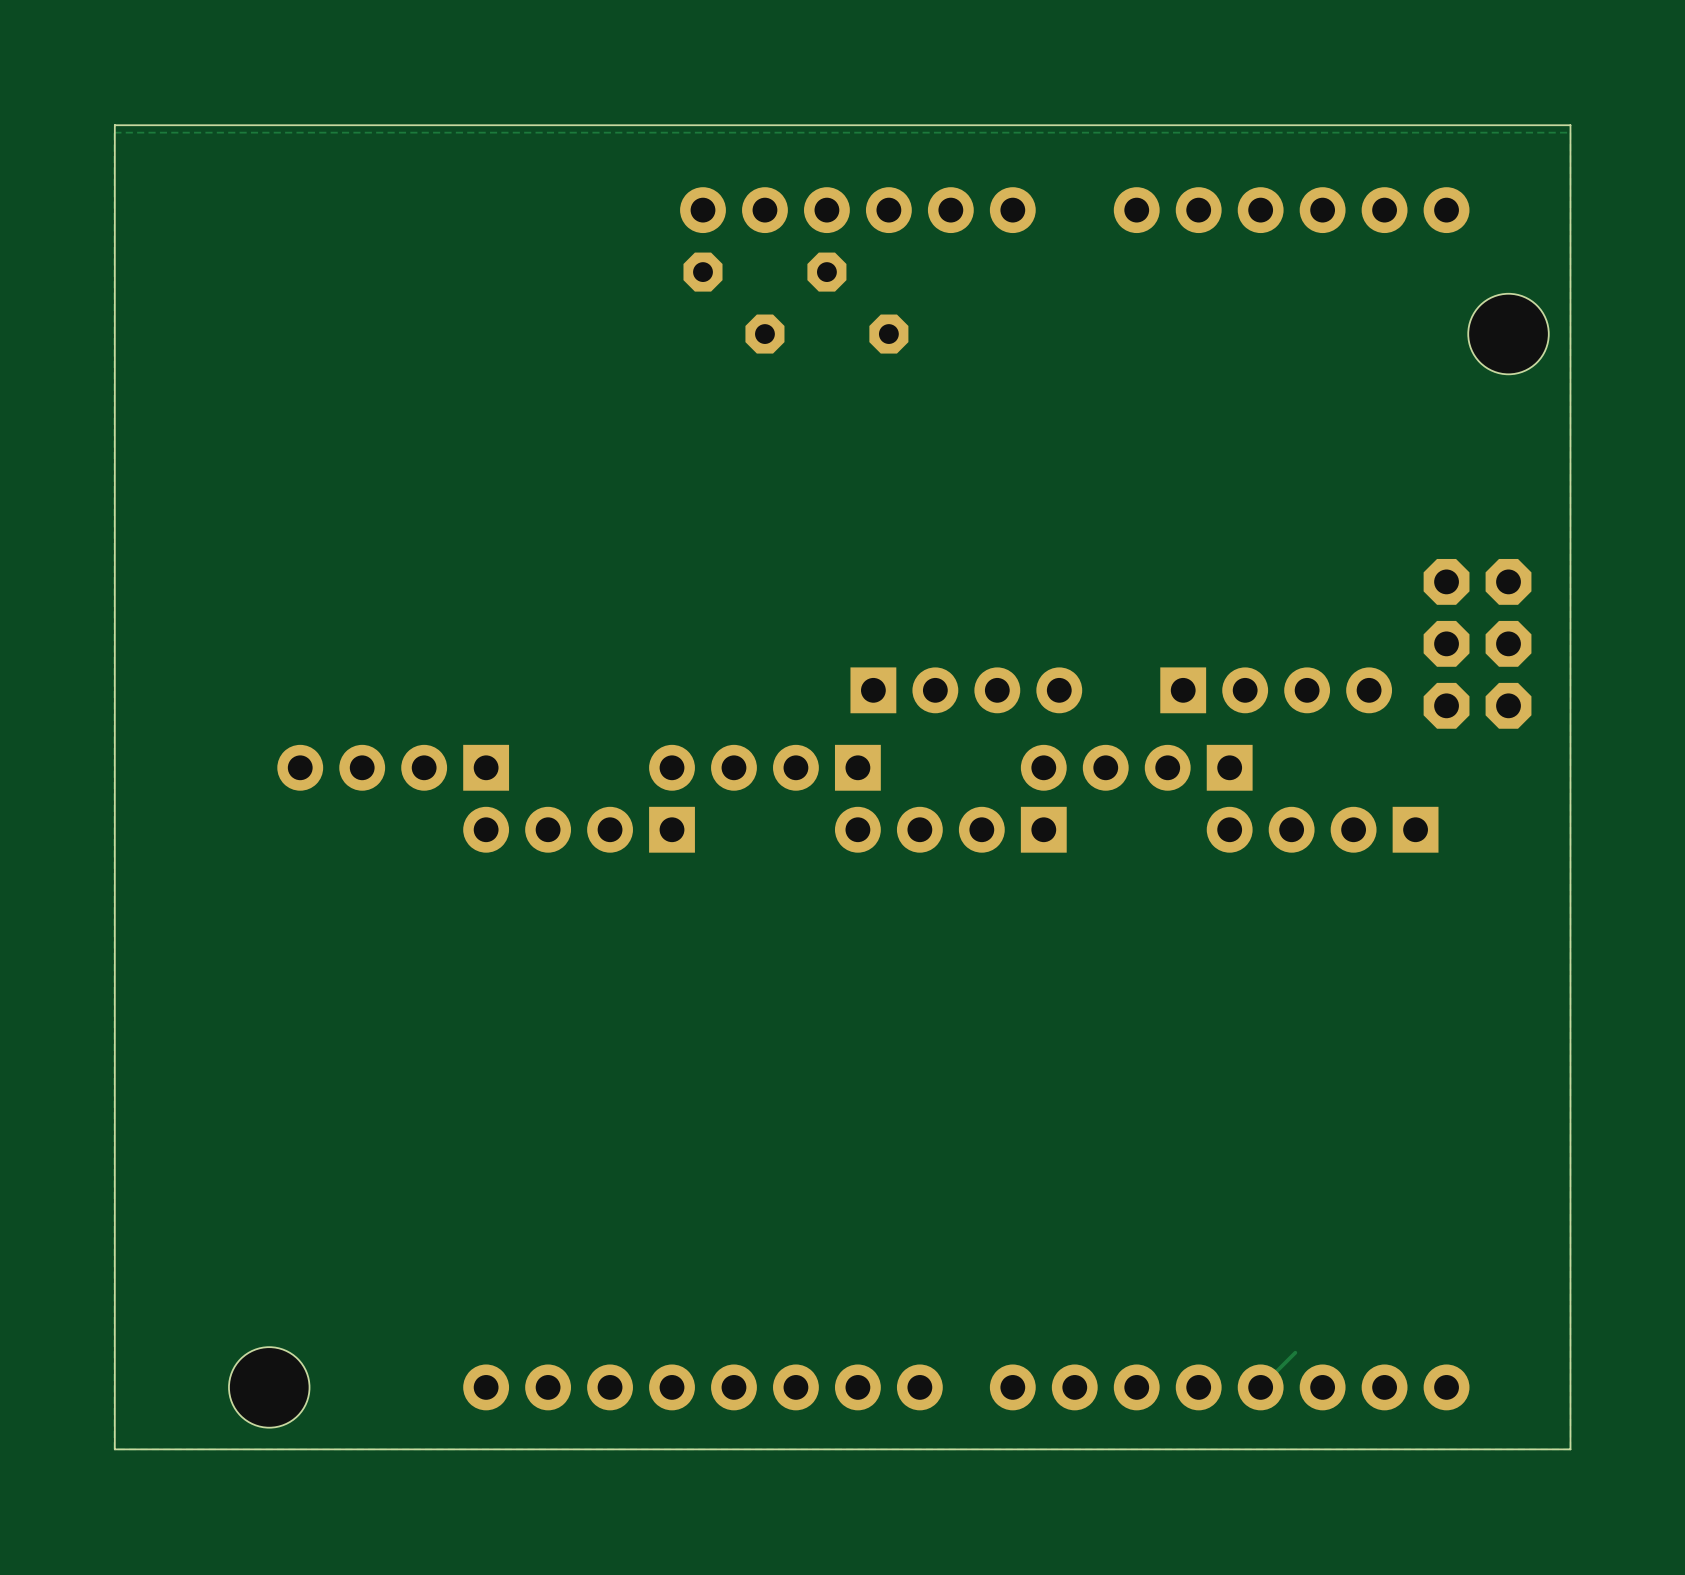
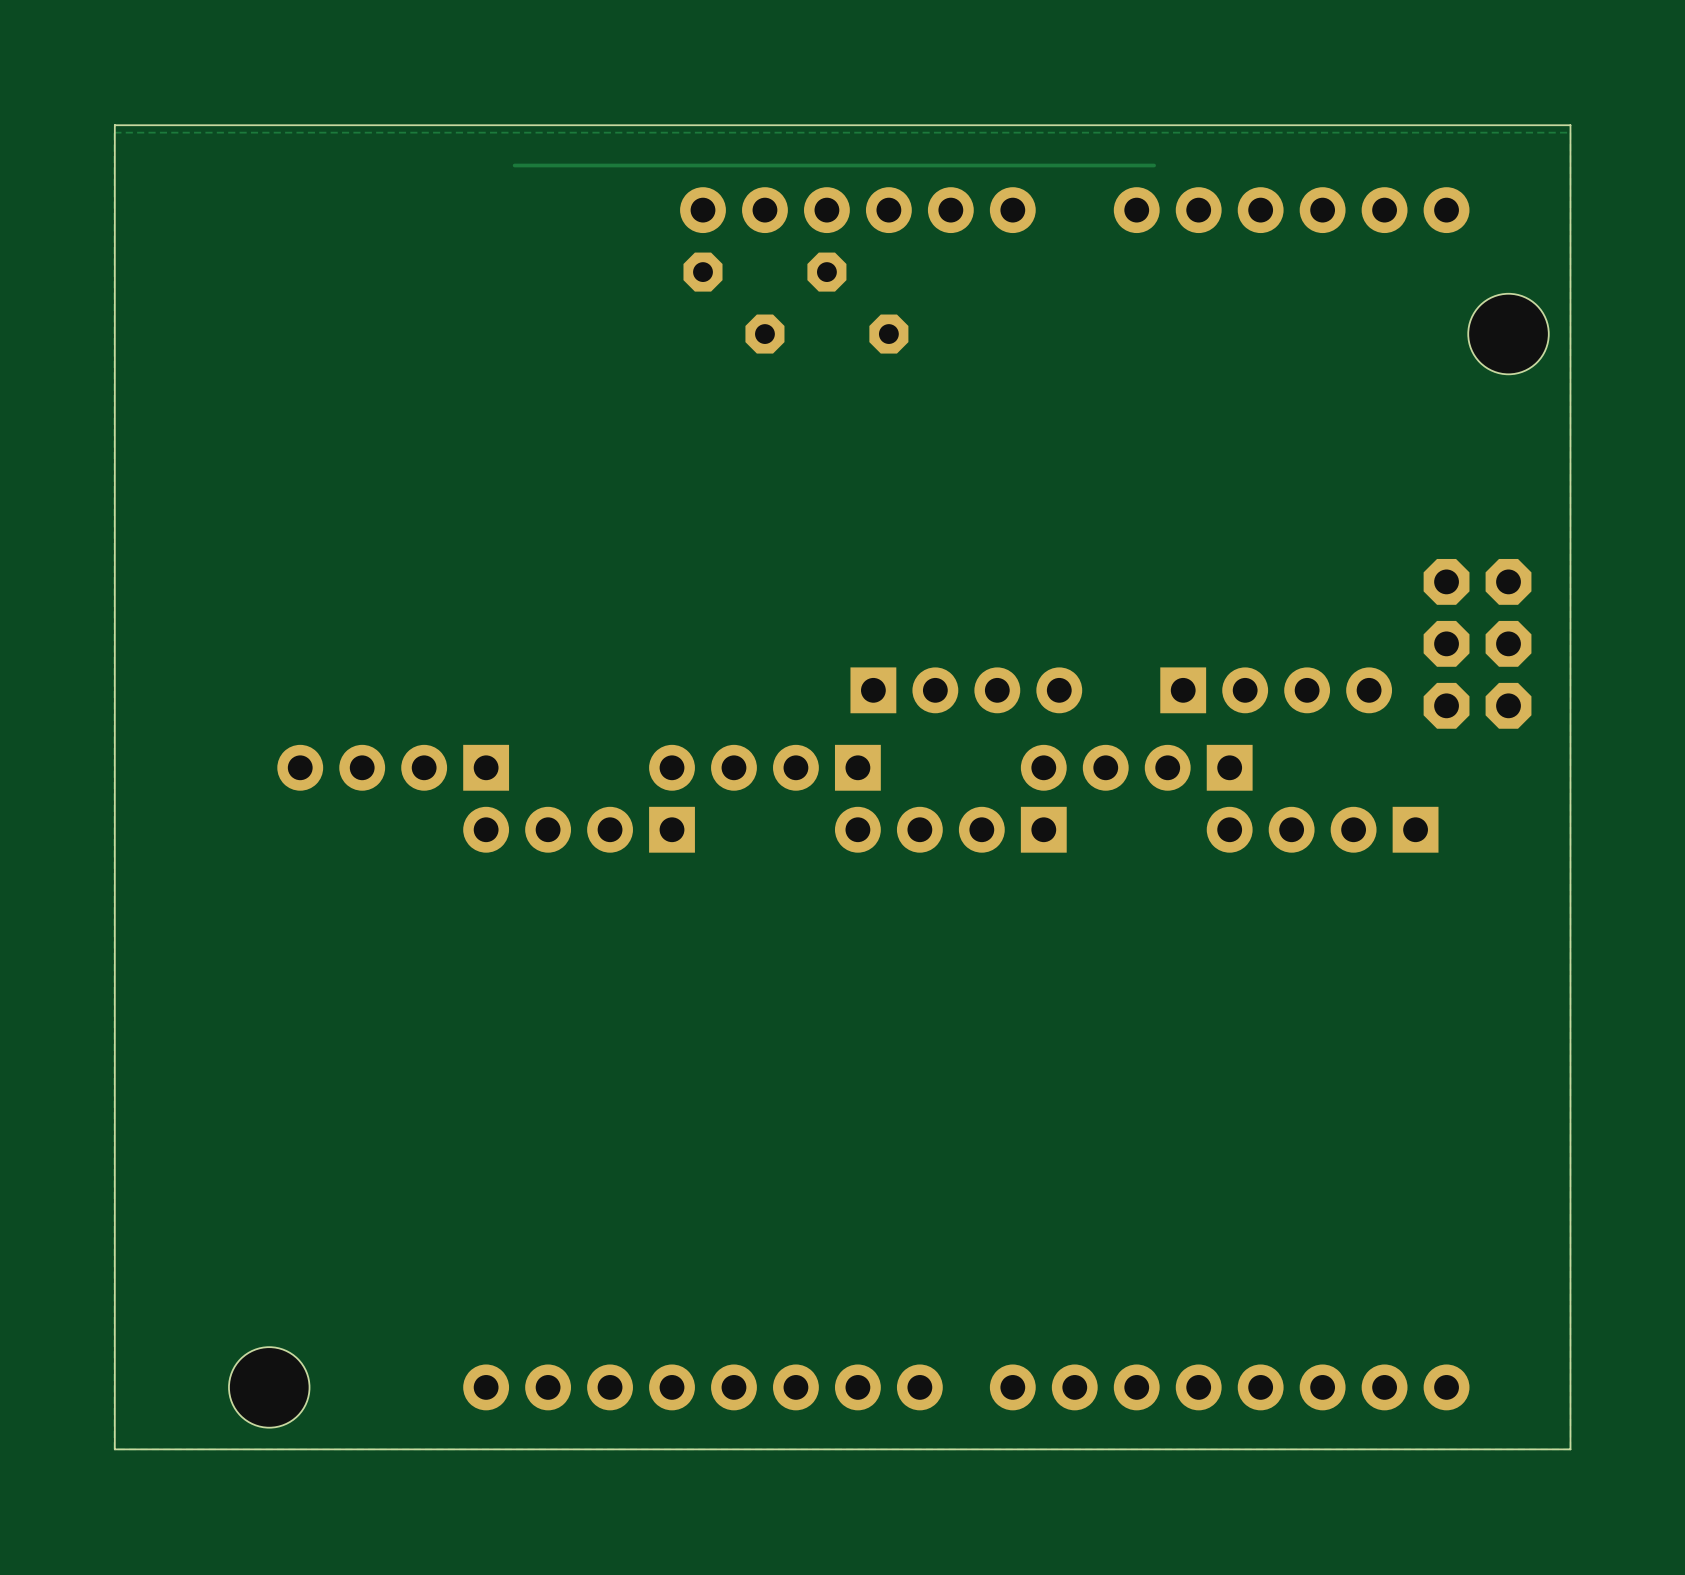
track: none -> (1154, 165) (514, 165)
track: (1295, 1352) (1260, 1387) -> none

